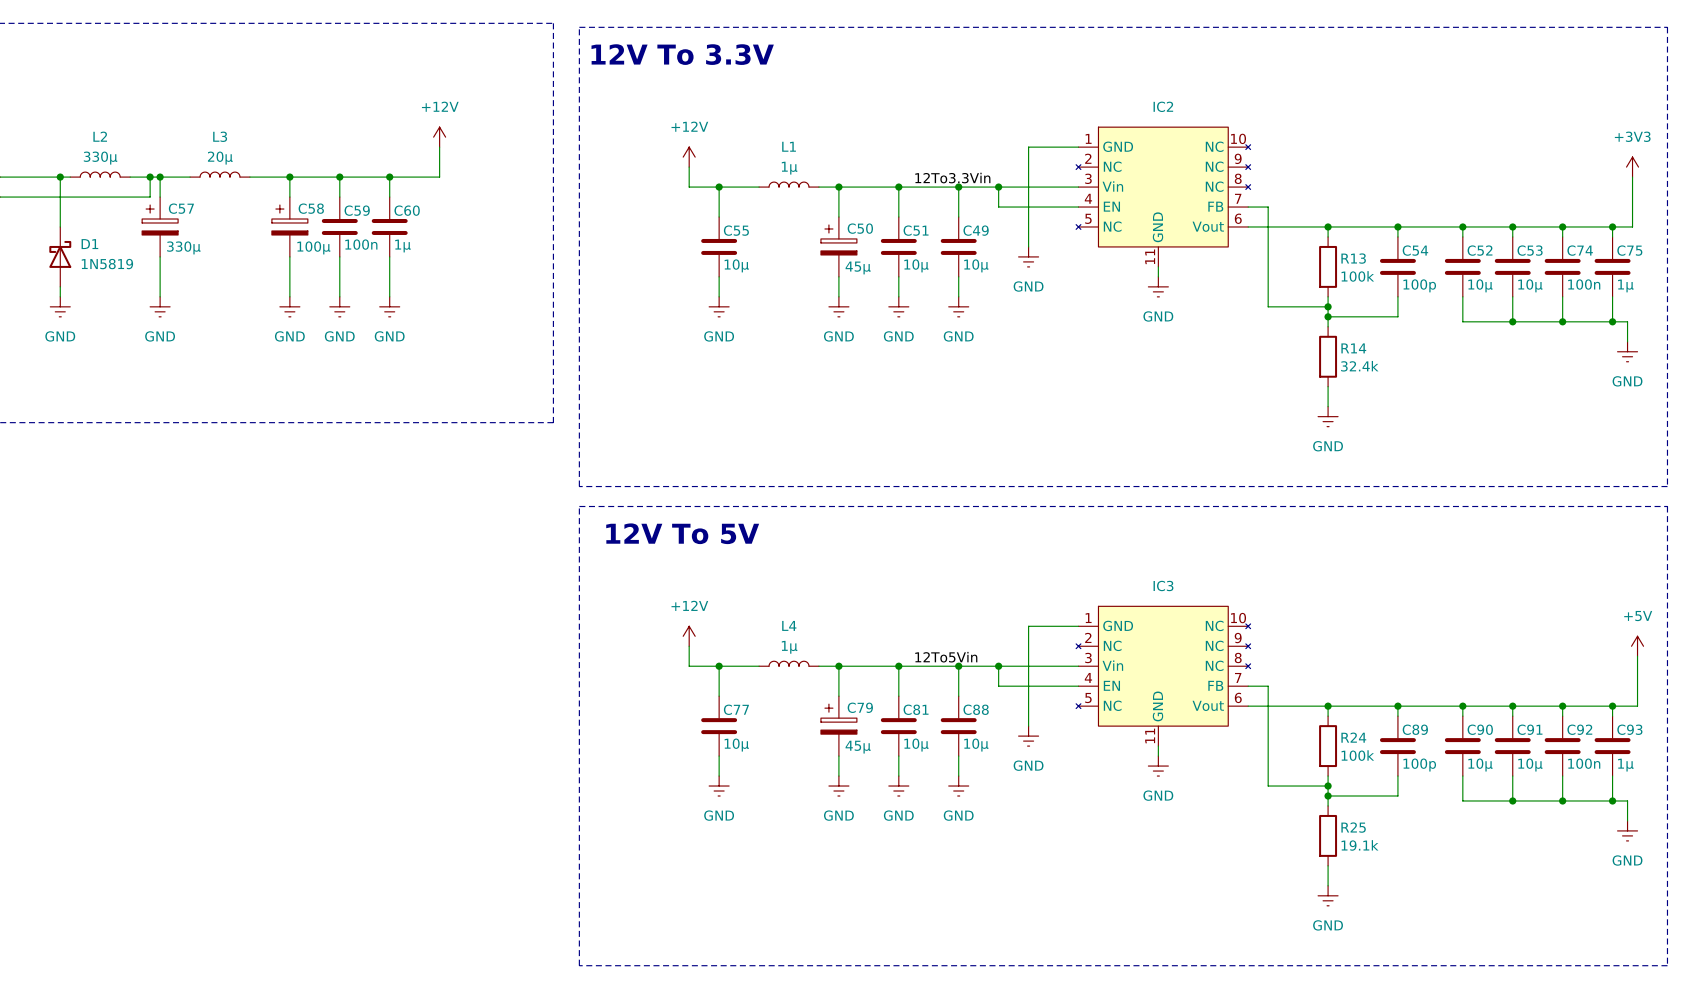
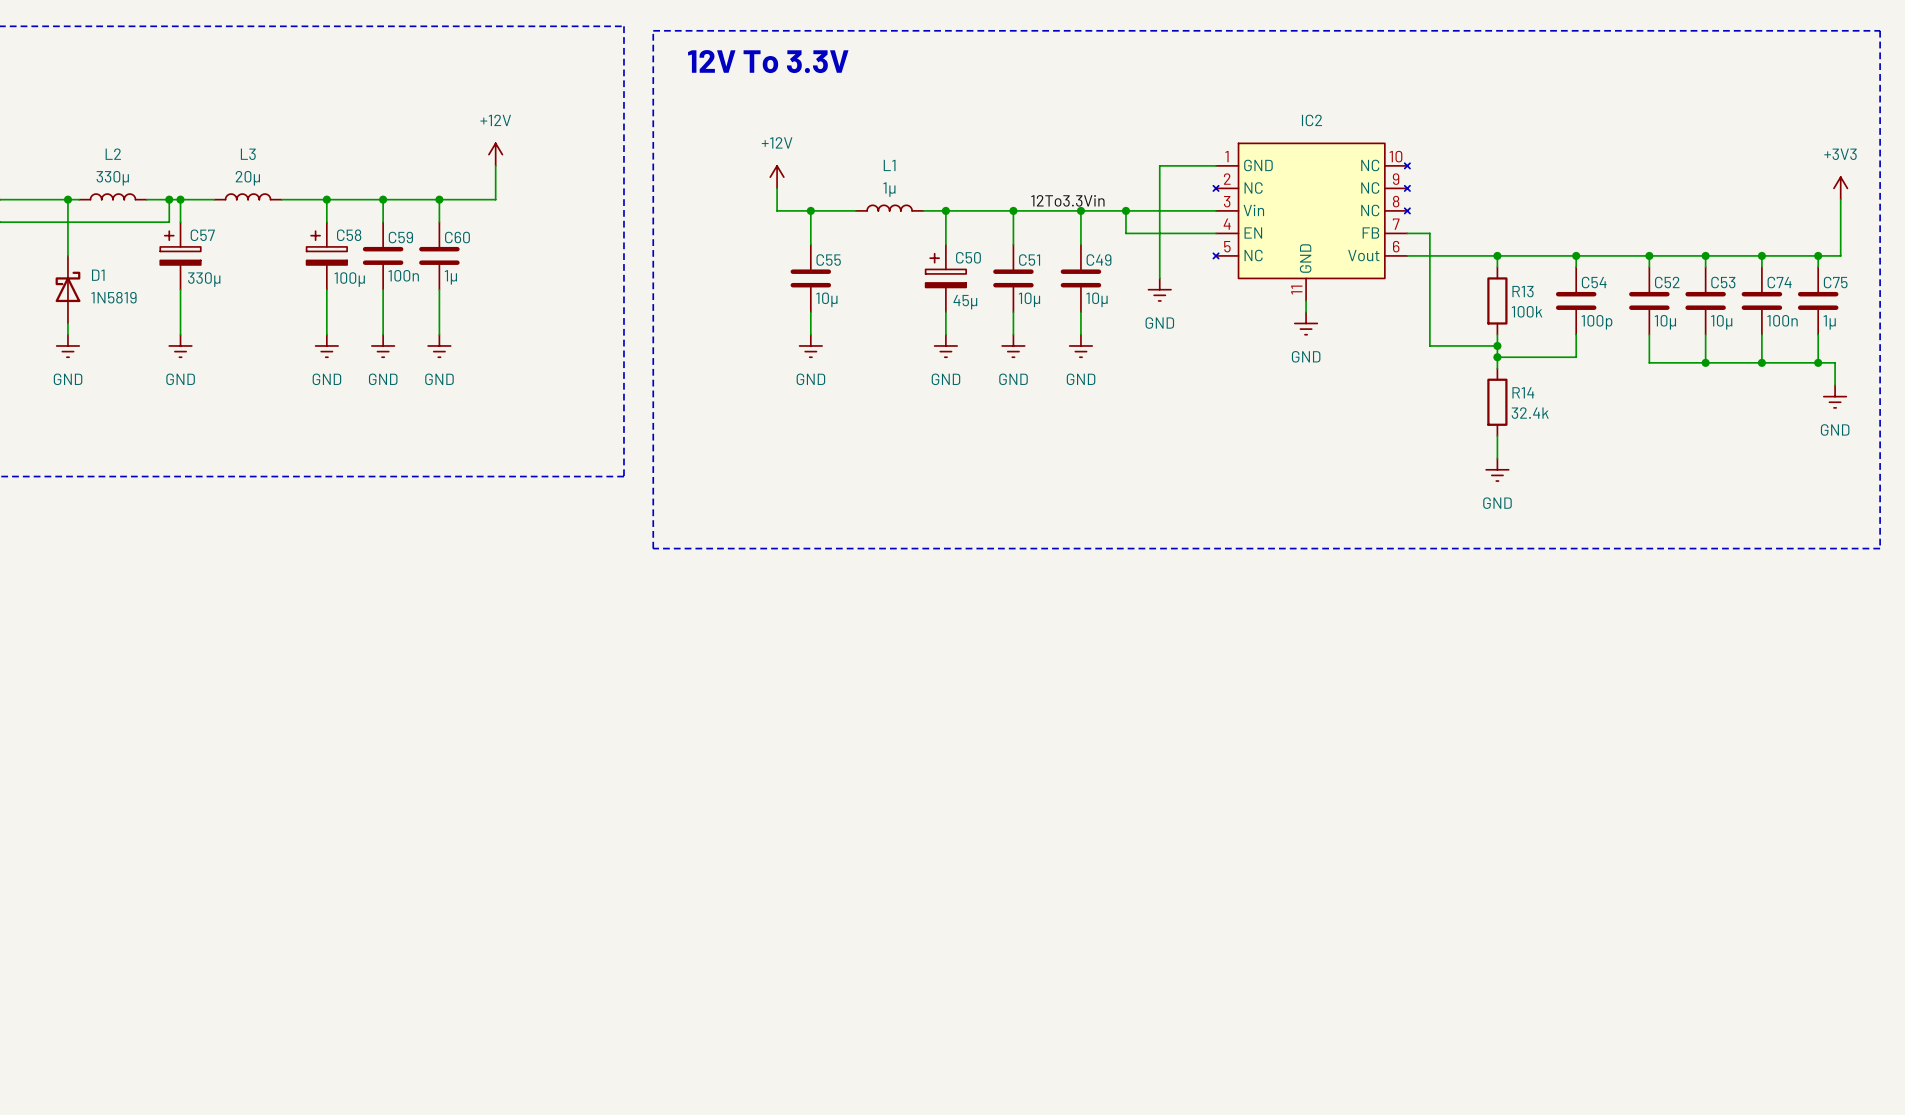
line: (579, 506) (1667, 506) (1667, 965) (579, 965) (579, 506) -> none
text: 12V To 5V (682, 533) -> none
wire: (1078, 626) (1028, 626) (1028, 726) -> none
power symbol: +12V (689, 636) -> none
wire: (689, 646) (689, 666) (759, 666) -> none
power symbol: +5V (1637, 646) -> none
wire: (1637, 656) (1637, 706) (1248, 706) -> none
label: 12To5Vin (946, 657) -> none
L4: 1µ (789, 663) -> none
wire: (719, 666) (719, 696) -> none
junction: (719, 666) -> none
wire: (818, 666) (1078, 666) -> none
wire: (838, 666) (838, 696) -> none
junction: (838, 666) -> none
wire: (898, 666) (898, 696) -> none
junction: (898, 666) -> none
wire: (958, 666) (958, 696) -> none
junction: (958, 666) -> none
wire: (998, 666) (998, 686) (1078, 686) -> none
junction: (998, 666) -> none
IC3: (1163, 676) -> none
wire: (1248, 686) (1268, 686) (1268, 786) (1328, 786) -> none
wire: (1328, 706) (1328, 716) -> none
junction: (1328, 706) -> none
wire: (1397, 706) (1397, 716) -> none
junction: (1397, 706) -> none
wire: (1462, 706) (1462, 716) -> none
junction: (1462, 706) -> none
wire: (1512, 706) (1512, 716) -> none
junction: (1512, 706) -> none
wire: (1562, 706) (1562, 716) -> none
junction: (1562, 706) -> none
wire: (1612, 706) (1612, 716) -> none
junction: (1612, 706) -> none
C77: 10µ (719, 726) -> none
C79: 45µ (838, 726) -> none
C81: 10µ (898, 726) -> none
C88: 10µ (958, 726) -> none
power symbol: GND (1028, 736) -> none
wire: (1158, 746) (1158, 756) -> none
R24: 100k (1328, 746) -> none
C89: 100p (1397, 746) -> none
C90: 10µ (1462, 746) -> none
C91: 10µ (1512, 746) -> none
C92: 100n (1562, 746) -> none
C93: 1µ (1612, 746) -> none
wire: (719, 756) (719, 776) -> none
wire: (838, 756) (838, 776) -> none
wire: (898, 756) (898, 776) -> none
wire: (958, 756) (958, 776) -> none
power symbol: GND (1158, 766) -> none
wire: (1328, 776) (1328, 805) -> none
wire: (1397, 776) (1397, 796) (1328, 796) -> none
wire: (1462, 776) (1462, 800) (1627, 800) (1627, 820) -> none
wire: (1512, 776) (1512, 800) -> none
wire: (1562, 776) (1562, 800) -> none
wire: (1612, 776) (1612, 800) -> none
power symbol: GND (719, 786) -> none
power symbol: GND (838, 786) -> none
power symbol: GND (898, 786) -> none
power symbol: GND (958, 786) -> none
junction: (1328, 786) -> none
junction: (1328, 796) -> none
junction: (1512, 800) -> none
junction: (1562, 800) -> none
junction: (1612, 800) -> none
power symbol: GND (1627, 830) -> none
R25: 19.1k (1328, 835) -> none
wire: (1328, 865) (1328, 885) -> none
power symbol: GND (1328, 895) -> none

